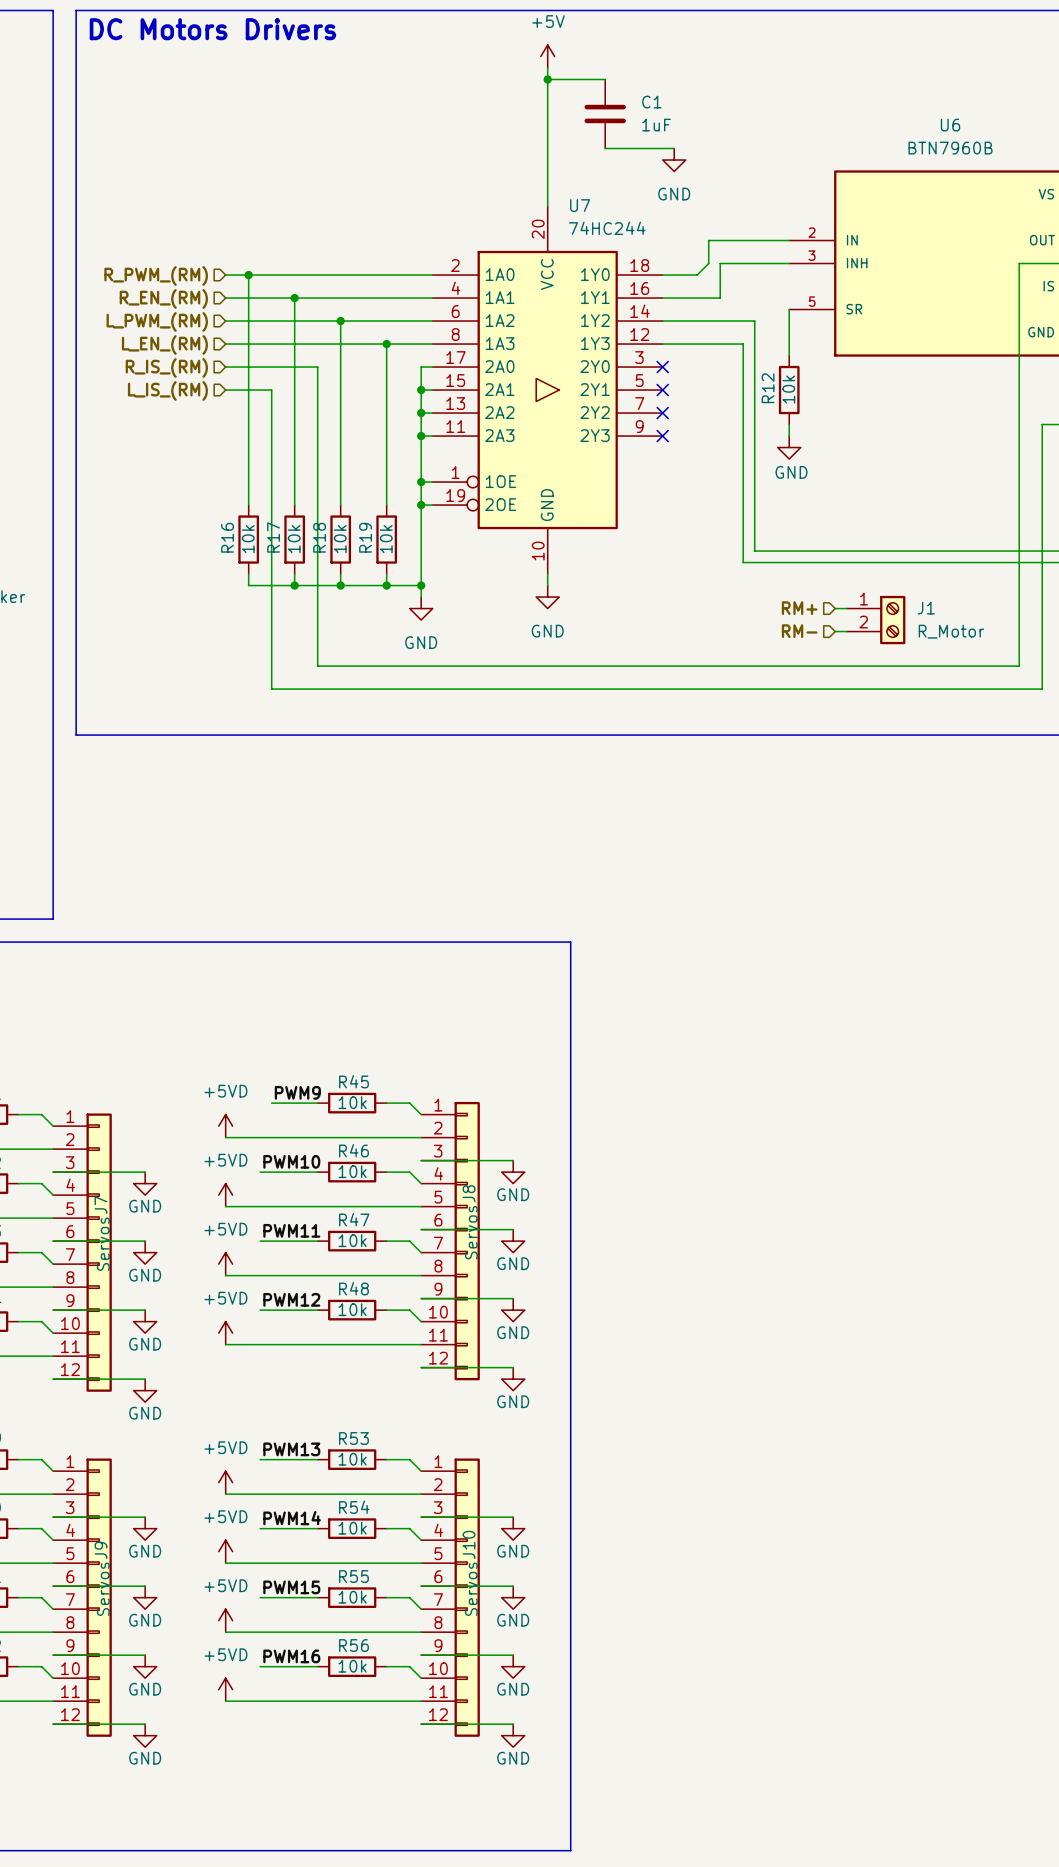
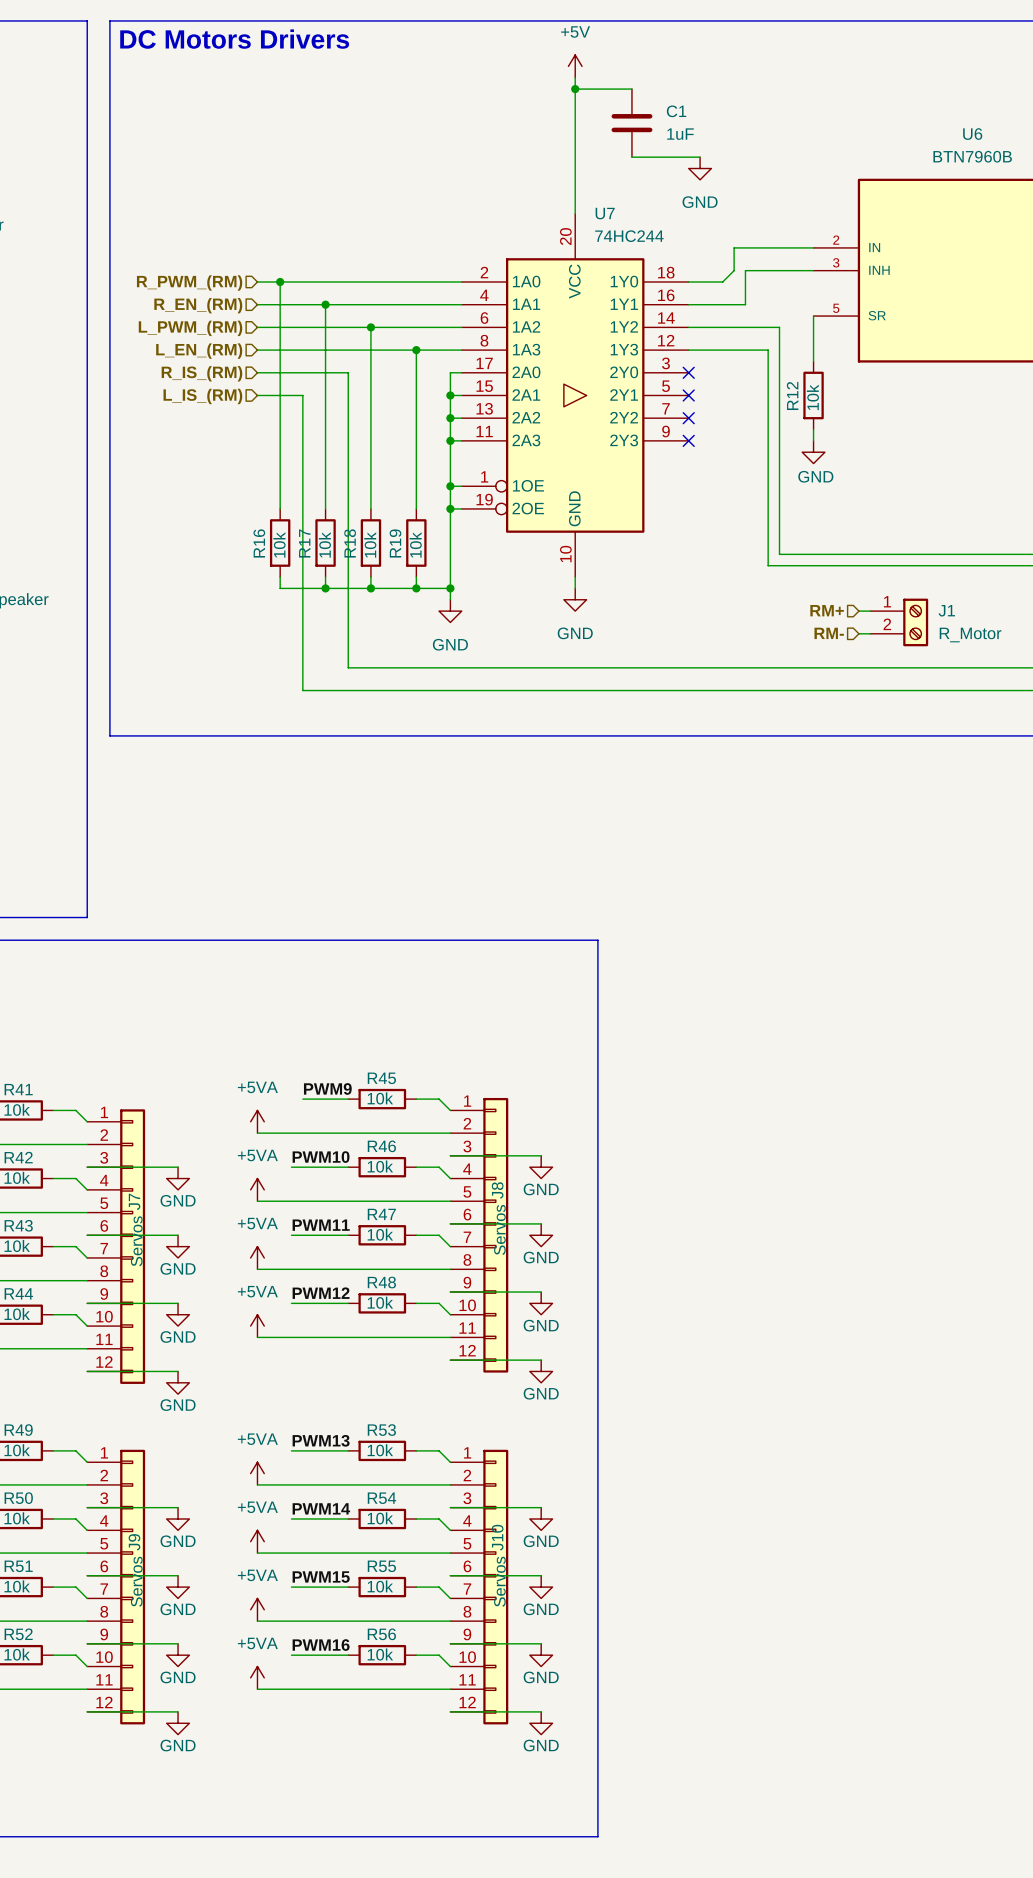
power symbol: +5VD (225, 1126) -> +5VA (257, 1121)
power symbol: +5VD (225, 1195) -> +5VA (257, 1189)
power symbol: +5VD (225, 1264) -> +5VA (257, 1257)
power symbol: +5VD (225, 1333) -> +5VA (257, 1326)
power symbol: +5VD (225, 1482) -> +5VA (257, 1473)
power symbol: +5VD (225, 1551) -> +5VA (257, 1541)
power symbol: +5VD (225, 1620) -> +5VA (257, 1609)
power symbol: +5VD (225, 1689) -> +5VA (257, 1677)

